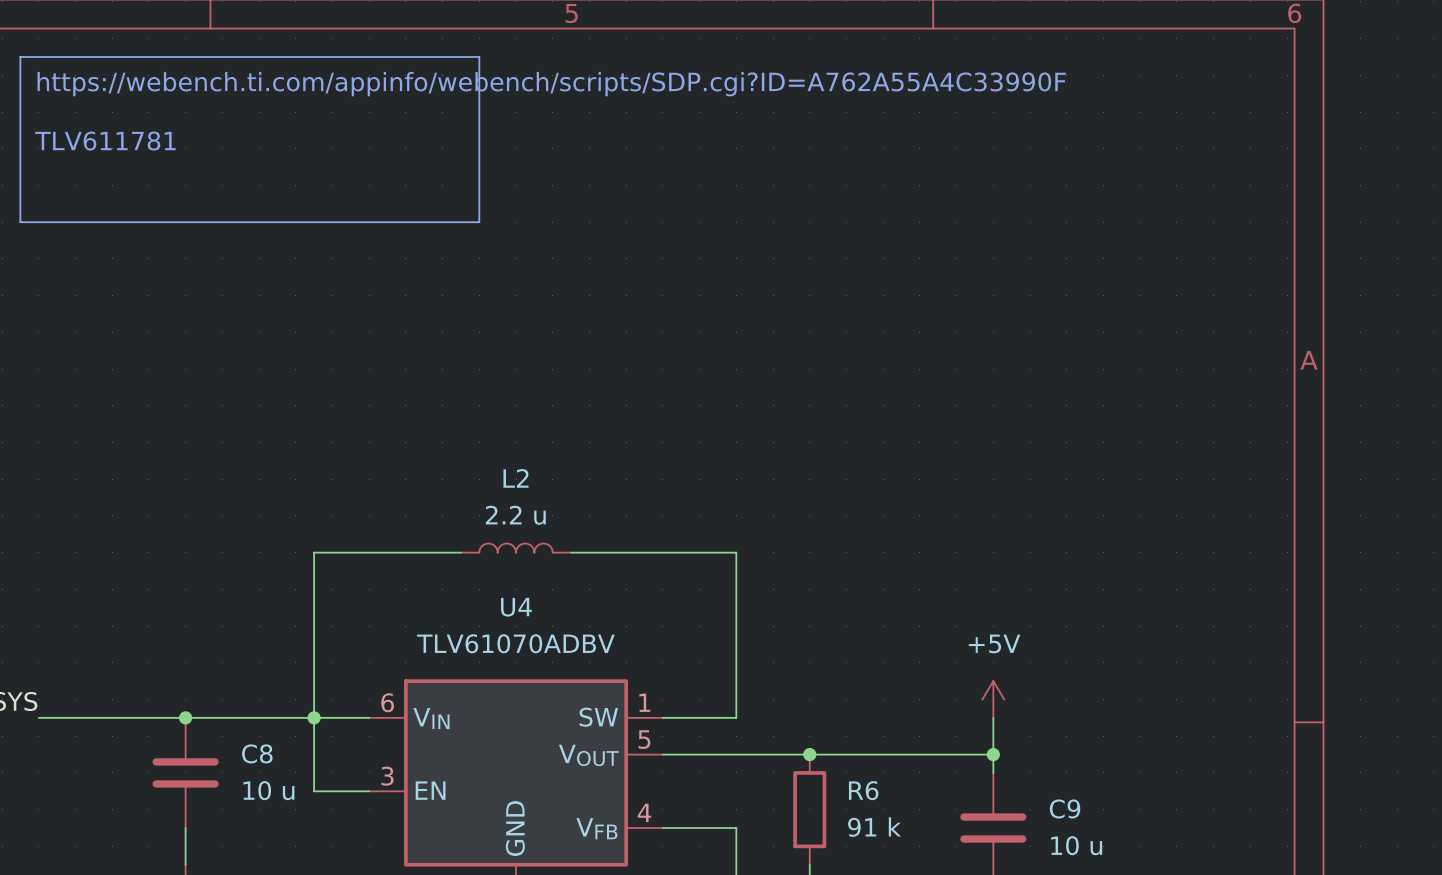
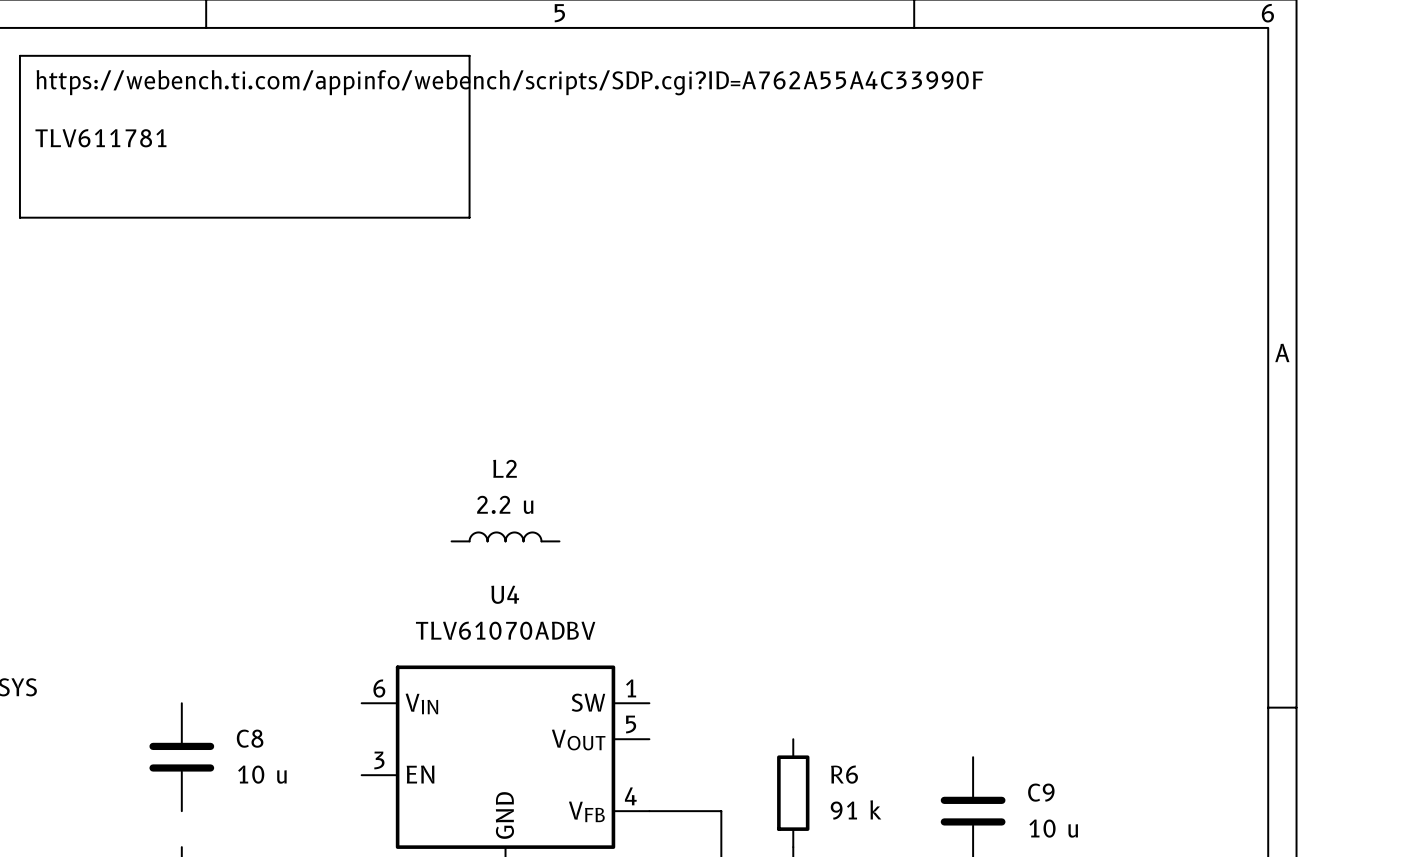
wire: (460, 552) (314, 552) (314, 791) (369, 791) -> none
wire: (571, 552) (736, 552) (736, 717) (662, 717) -> none
power symbol: +5V (993, 699) -> none
wire: (38, 717) (369, 717) -> none
junction: (185, 717) -> none
junction: (314, 717) -> none
wire: (993, 717) (993, 772) -> none
wire: (662, 754) (993, 754) -> none
junction: (809, 754) -> none
junction: (993, 754) -> none
wire: (185, 828) (185, 864) -> none

